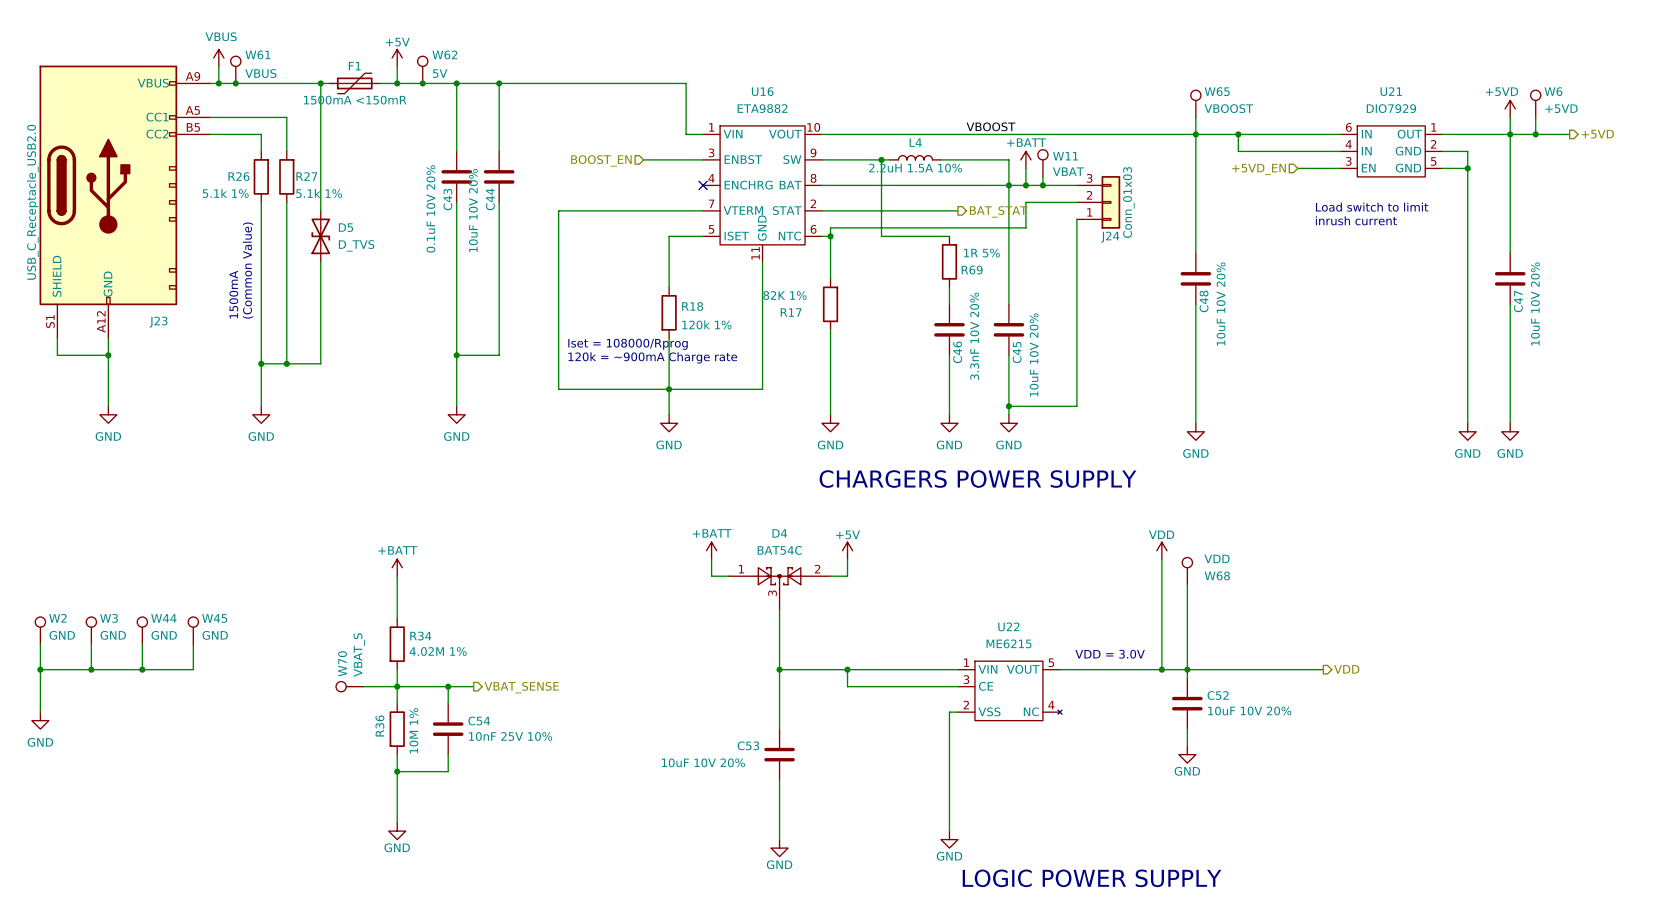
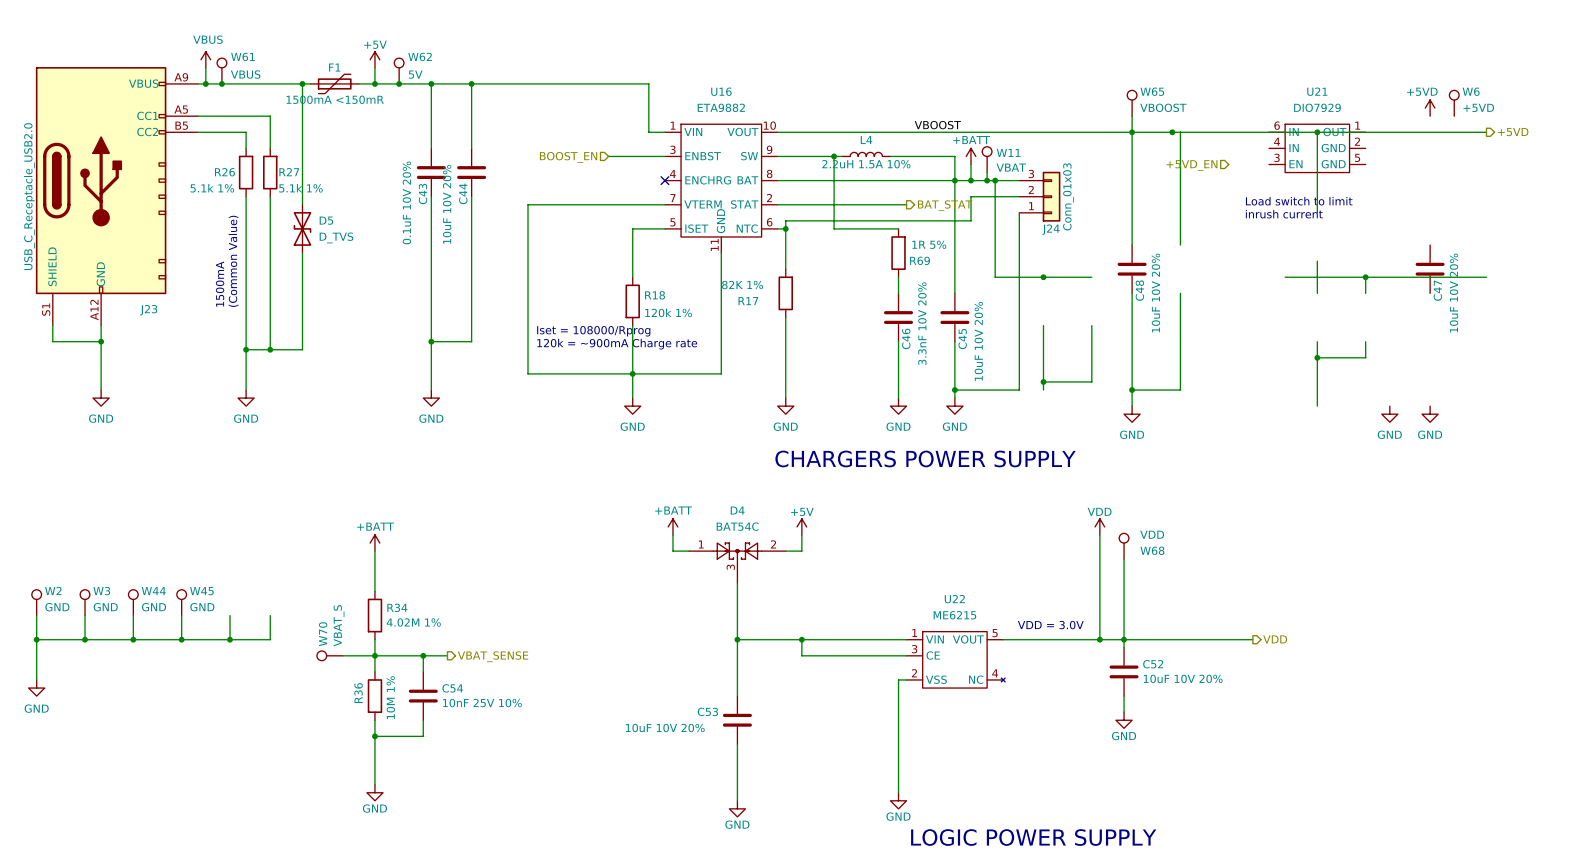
wire: (1510, 117) (1510, 253) -> none
wire: (1535, 117) (1535, 134) -> none
wire: (1238, 134) (1238, 151) (1340, 151) -> none
wire: none -> (1180, 132) (1180, 245)
wire: none -> (1269, 132) (1365, 132)
wire: none -> (1317, 132) (1317, 212)
junction: none -> (1317, 132)
junction: (1510, 134) -> none
junction: (1535, 134) -> none
wire: (1442, 151) (1467, 151) (1467, 423) -> none
wire: (1297, 168) (1340, 168) -> none
wire: (1442, 168) (1467, 168) -> none
junction: (1467, 168) -> none
wire: none -> (995, 180) (995, 277) (1091, 277)
junction: none -> (995, 180)
wire: none -> (1317, 261) (1317, 293)
junction: none -> (1043, 277)
wire: none -> (1285, 277) (1486, 277)
wire: none -> (1365, 277) (1365, 293)
junction: none -> (1365, 277)
wire: none -> (1180, 293) (1180, 390) (1132, 390)
wire: (1510, 304) (1510, 423) -> none
wire: none -> (1043, 325) (1043, 390)
wire: none -> (1091, 325) (1091, 381) (1043, 381)
wire: none -> (1317, 341) (1317, 406)
wire: none -> (1365, 341) (1365, 357) (1317, 357)
junction: none -> (1317, 357)
junction: none -> (1043, 381)
junction: none -> (1132, 390)
wire: none -> (229, 615) (229, 639)
wire: none -> (270, 615) (270, 639) (181, 639)
junction: none -> (181, 639)
junction: none -> (229, 639)

